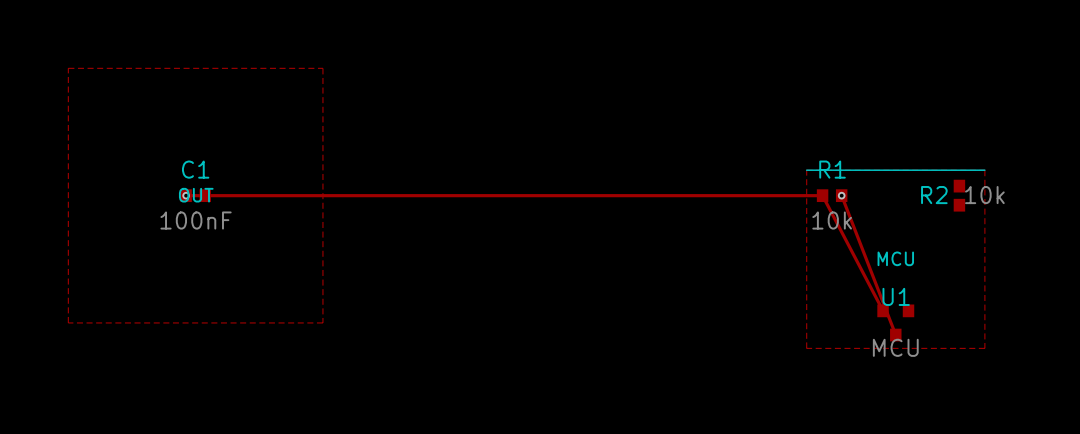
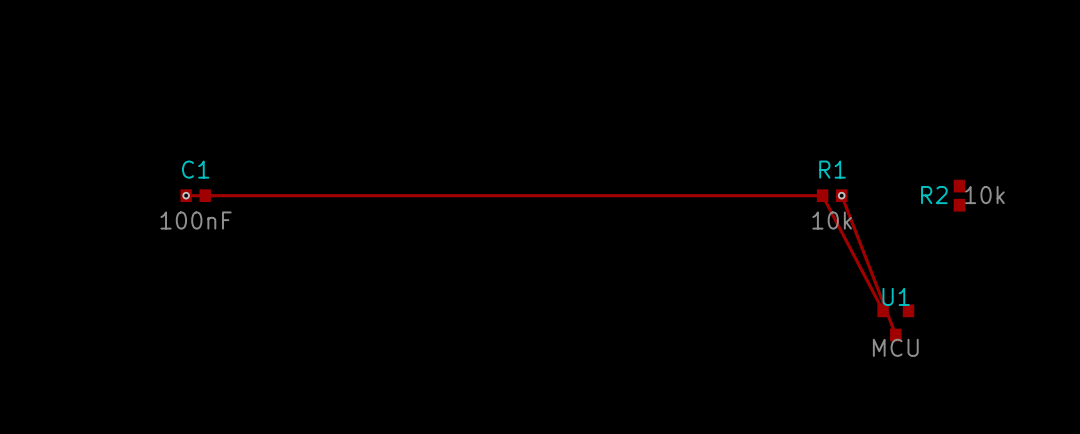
zone outline: (68, 68) (322, 68) (322, 322) (68, 322) (68, 68) -> none
line: (806, 170) (984, 170) -> none
zone outline: (806, 170) (984, 170) (984, 348) (806, 348) (806, 170) -> none
text: OUT (196, 195) -> none
text: MCU (895, 258) -> none

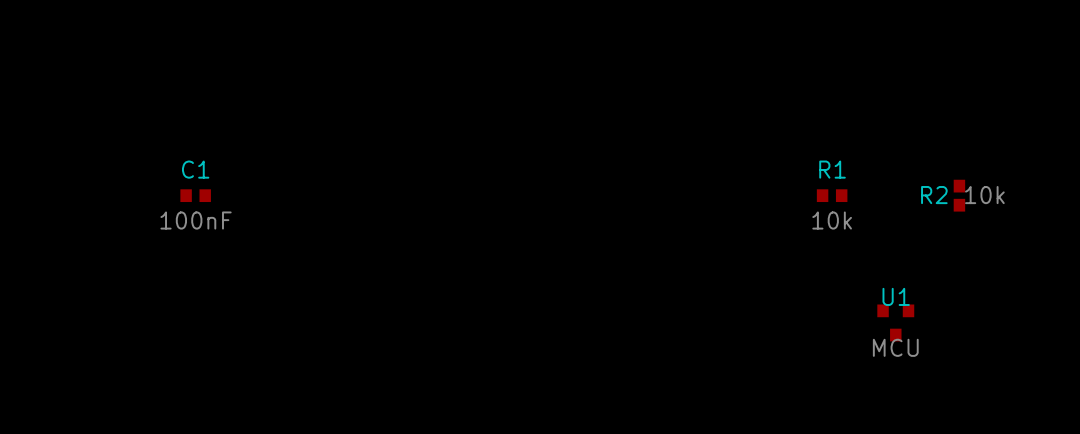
track: (186, 195) (822, 195) (883, 310) -> none
via: (186, 195) -> none
track: (841, 195) (895, 335) -> none
via: (841, 195) -> none

